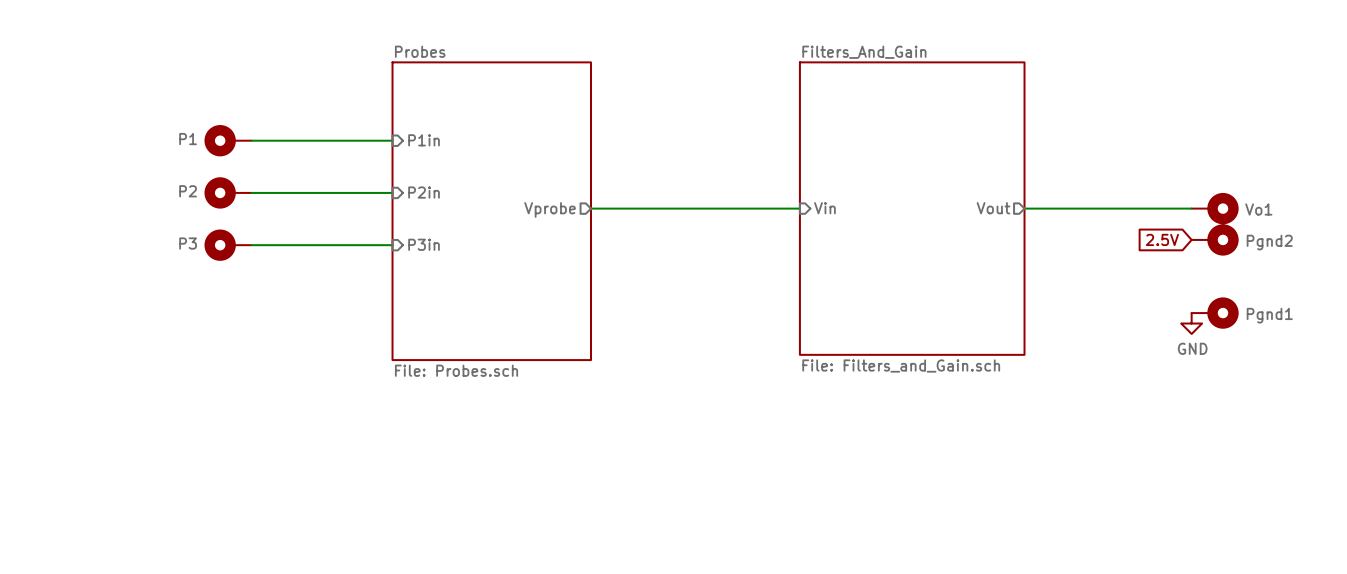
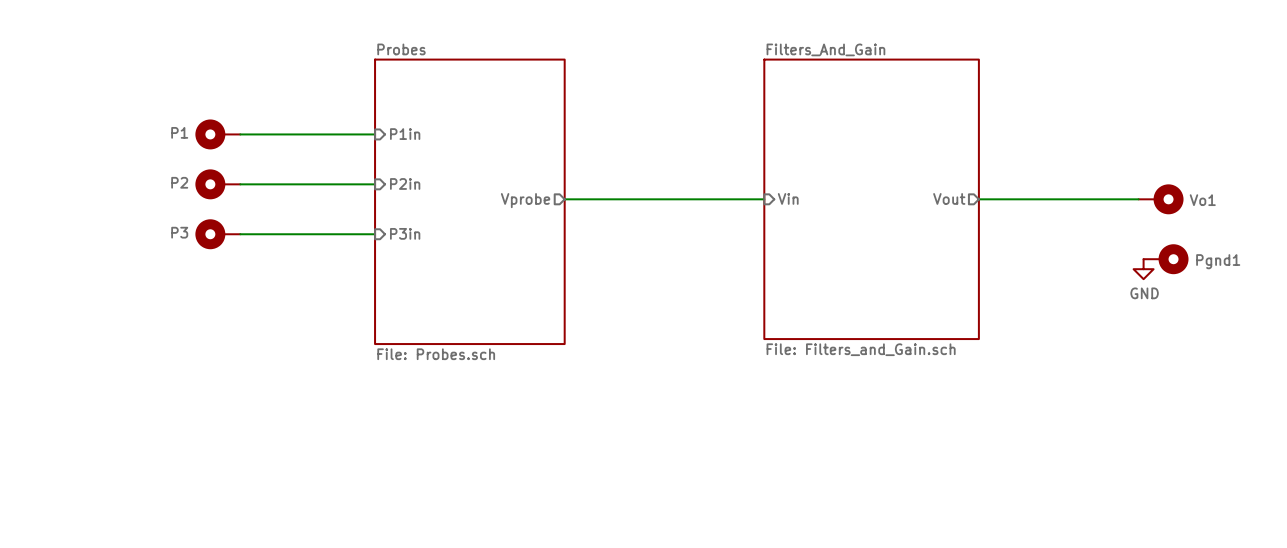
global label: 2.5V (1162, 239) -> none
Pgnd2: (1215, 239) -> none
Pgnd1 position: (1215, 313) -> (1166, 259)
power symbol position: GND (1191, 323) -> GND (1143, 269)

